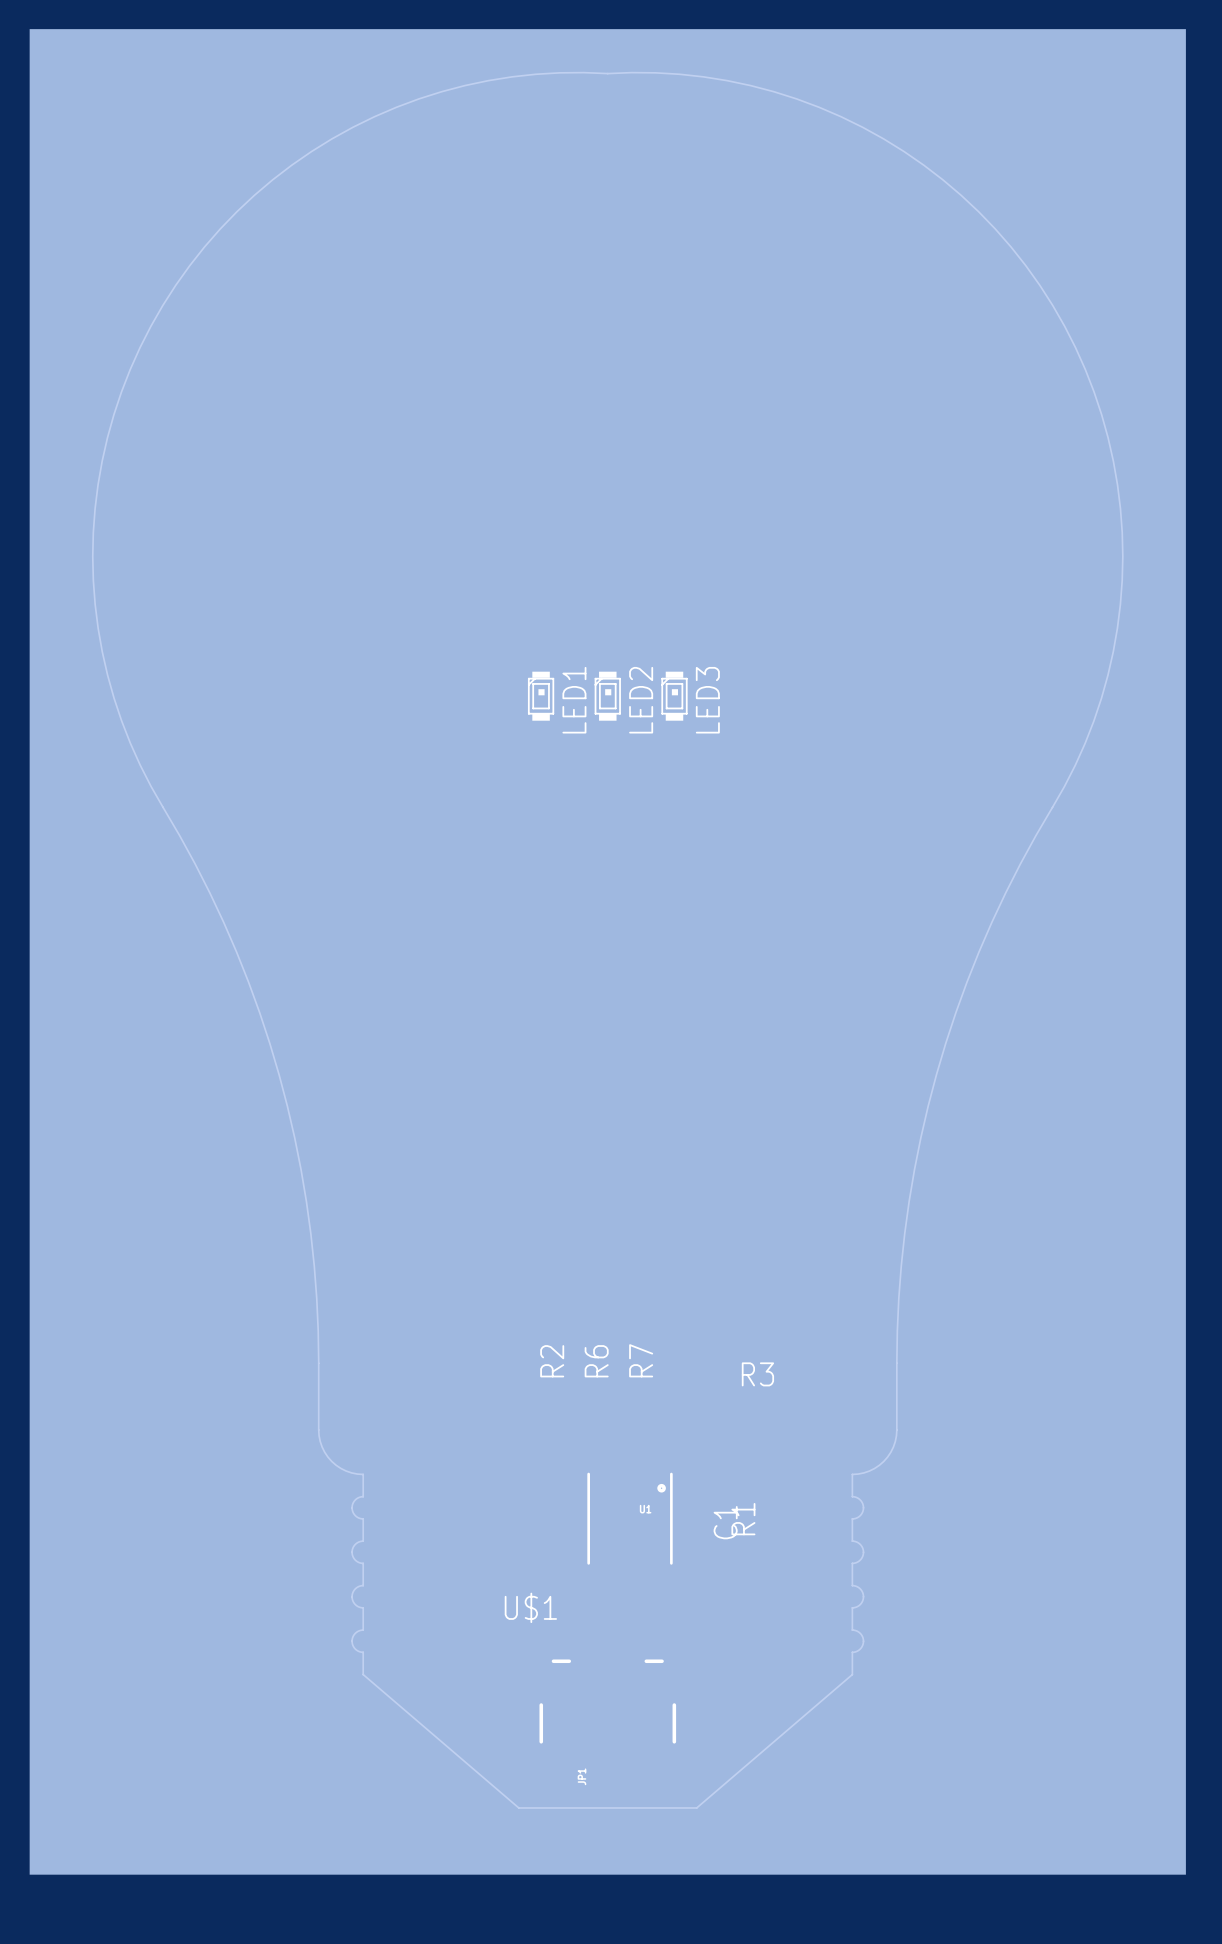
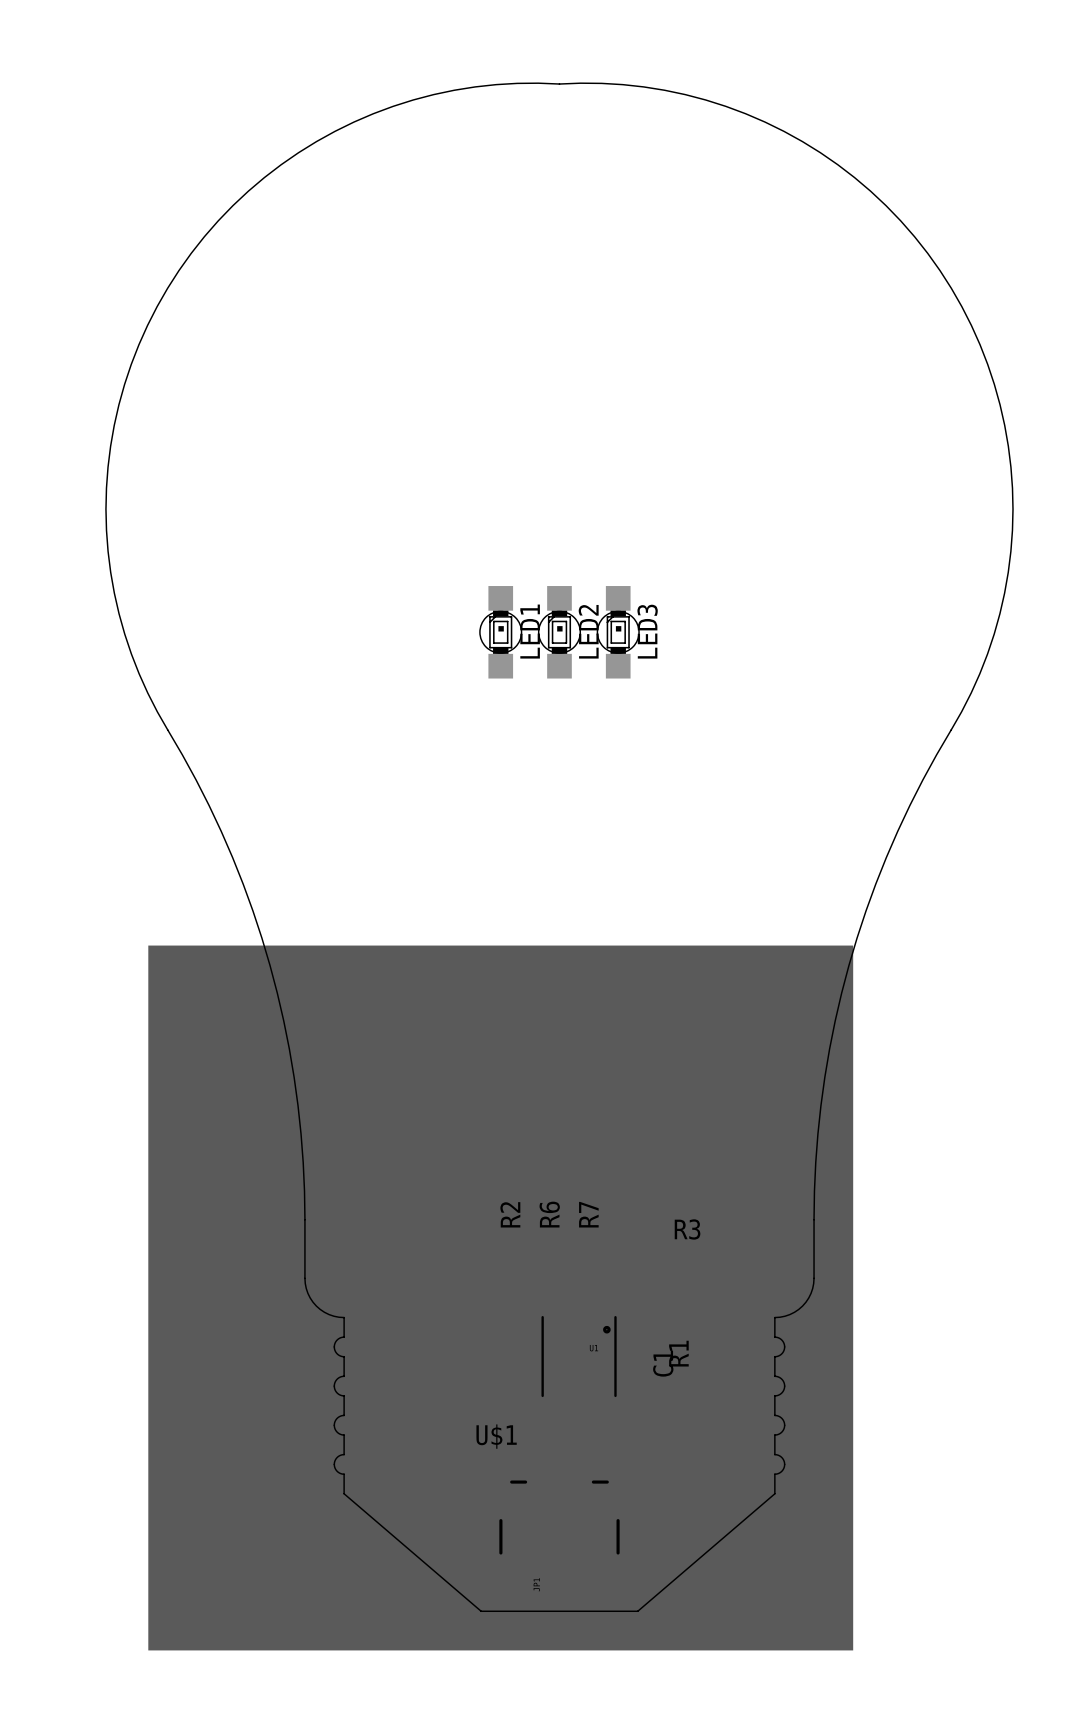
drawing: [29, 29, 1186, 1875] -> none
drawing: none -> [148, 945, 854, 1651]

